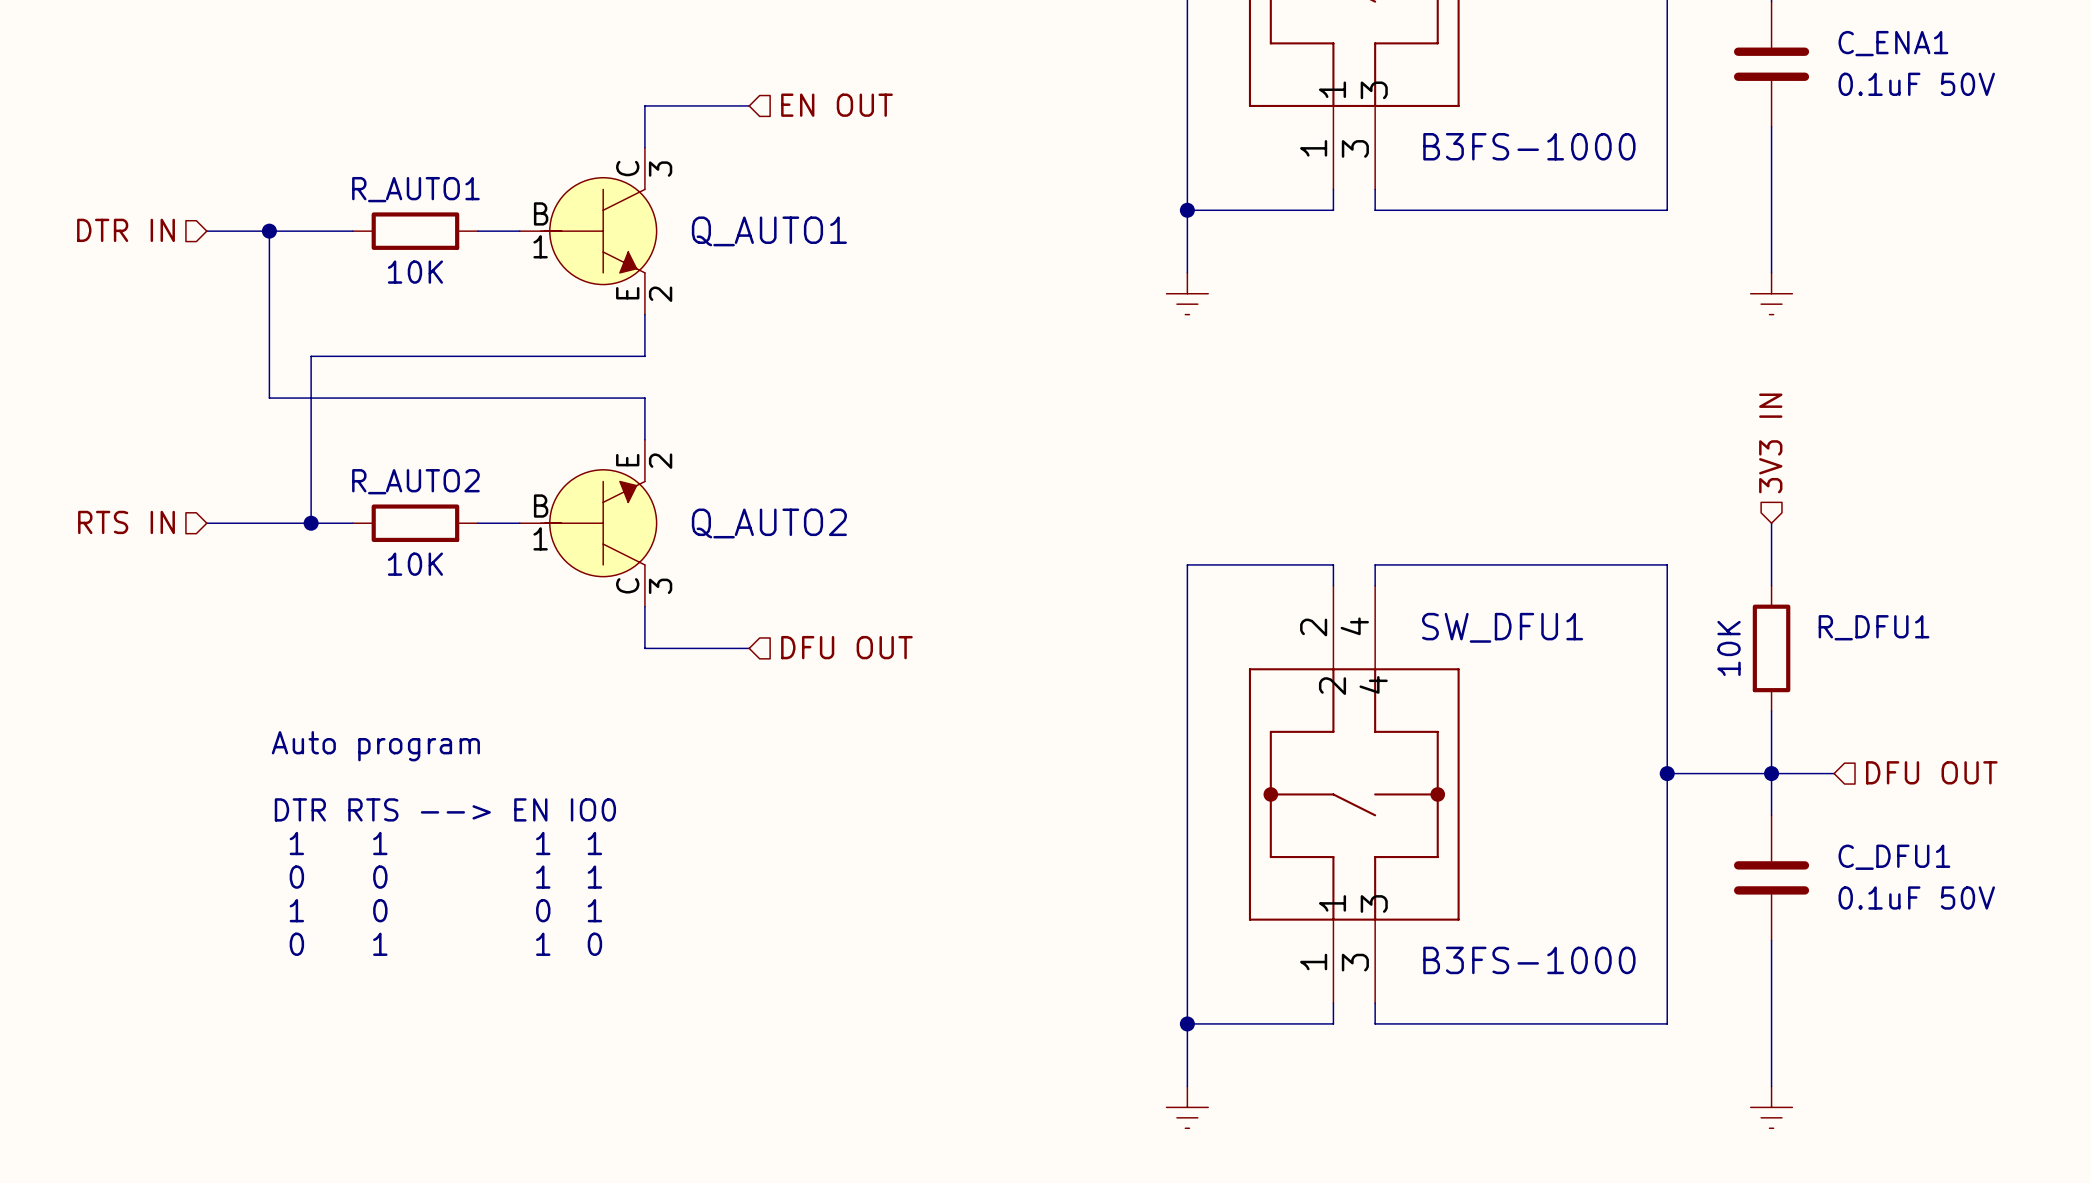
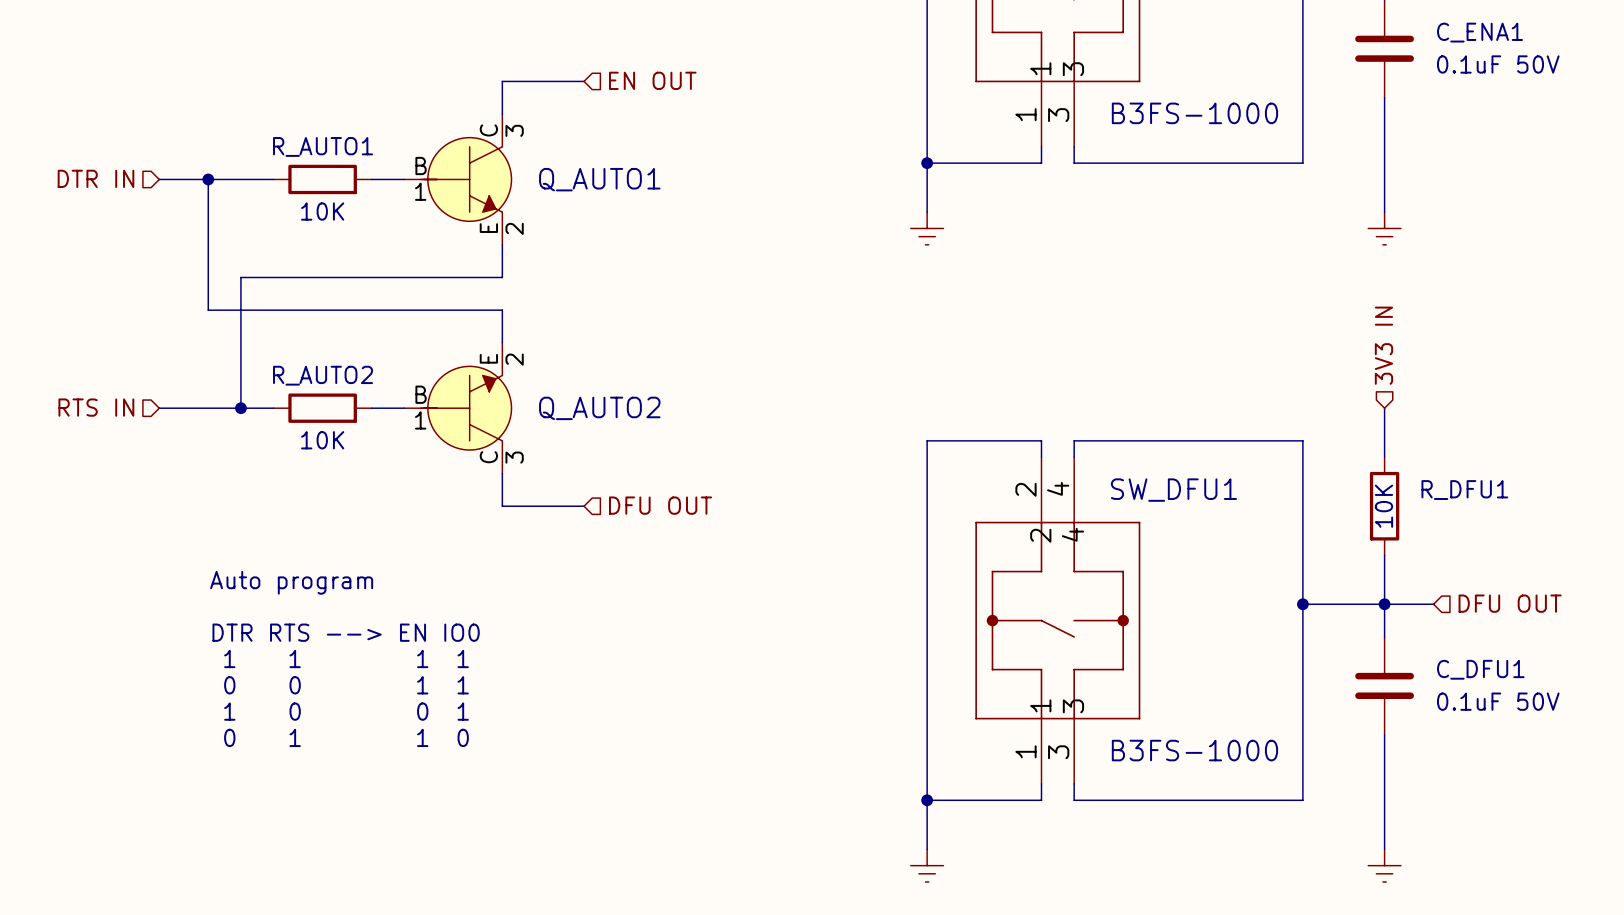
R_DFU1 value position: 10K (1729, 648) -> 10K (1383, 506)

